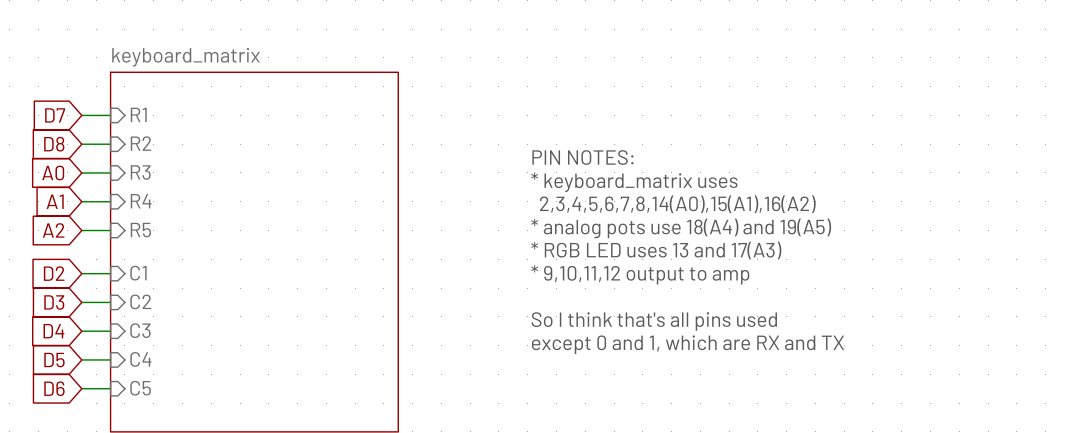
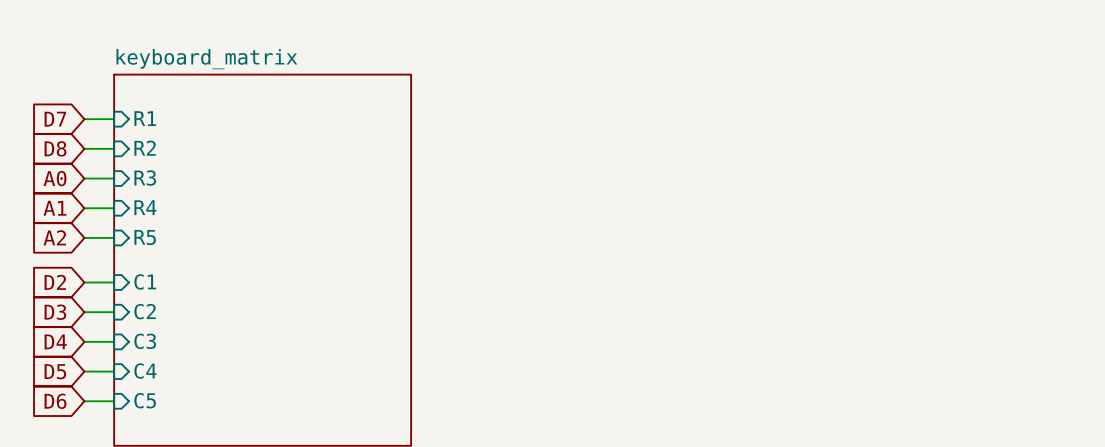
text: PIN NOTES: (582, 157) -> none
text: * keyboard_matrix uses (634, 182) -> none
text: 2,3,4,5,6,7,8,14(A0),15(A1),16(A2) (677, 204) -> none
text: * analog pots use 18(A4) and 19(A5) (681, 228) -> none
text: * RGB LED uses 13 and 17(A3) (656, 250) -> none
text: * 9,10,11,12 output to amp (640, 274) -> none
text: So I think that's all pins used (654, 321) -> none
text: except 0 and 1, which are RX and TX (687, 344) -> none

